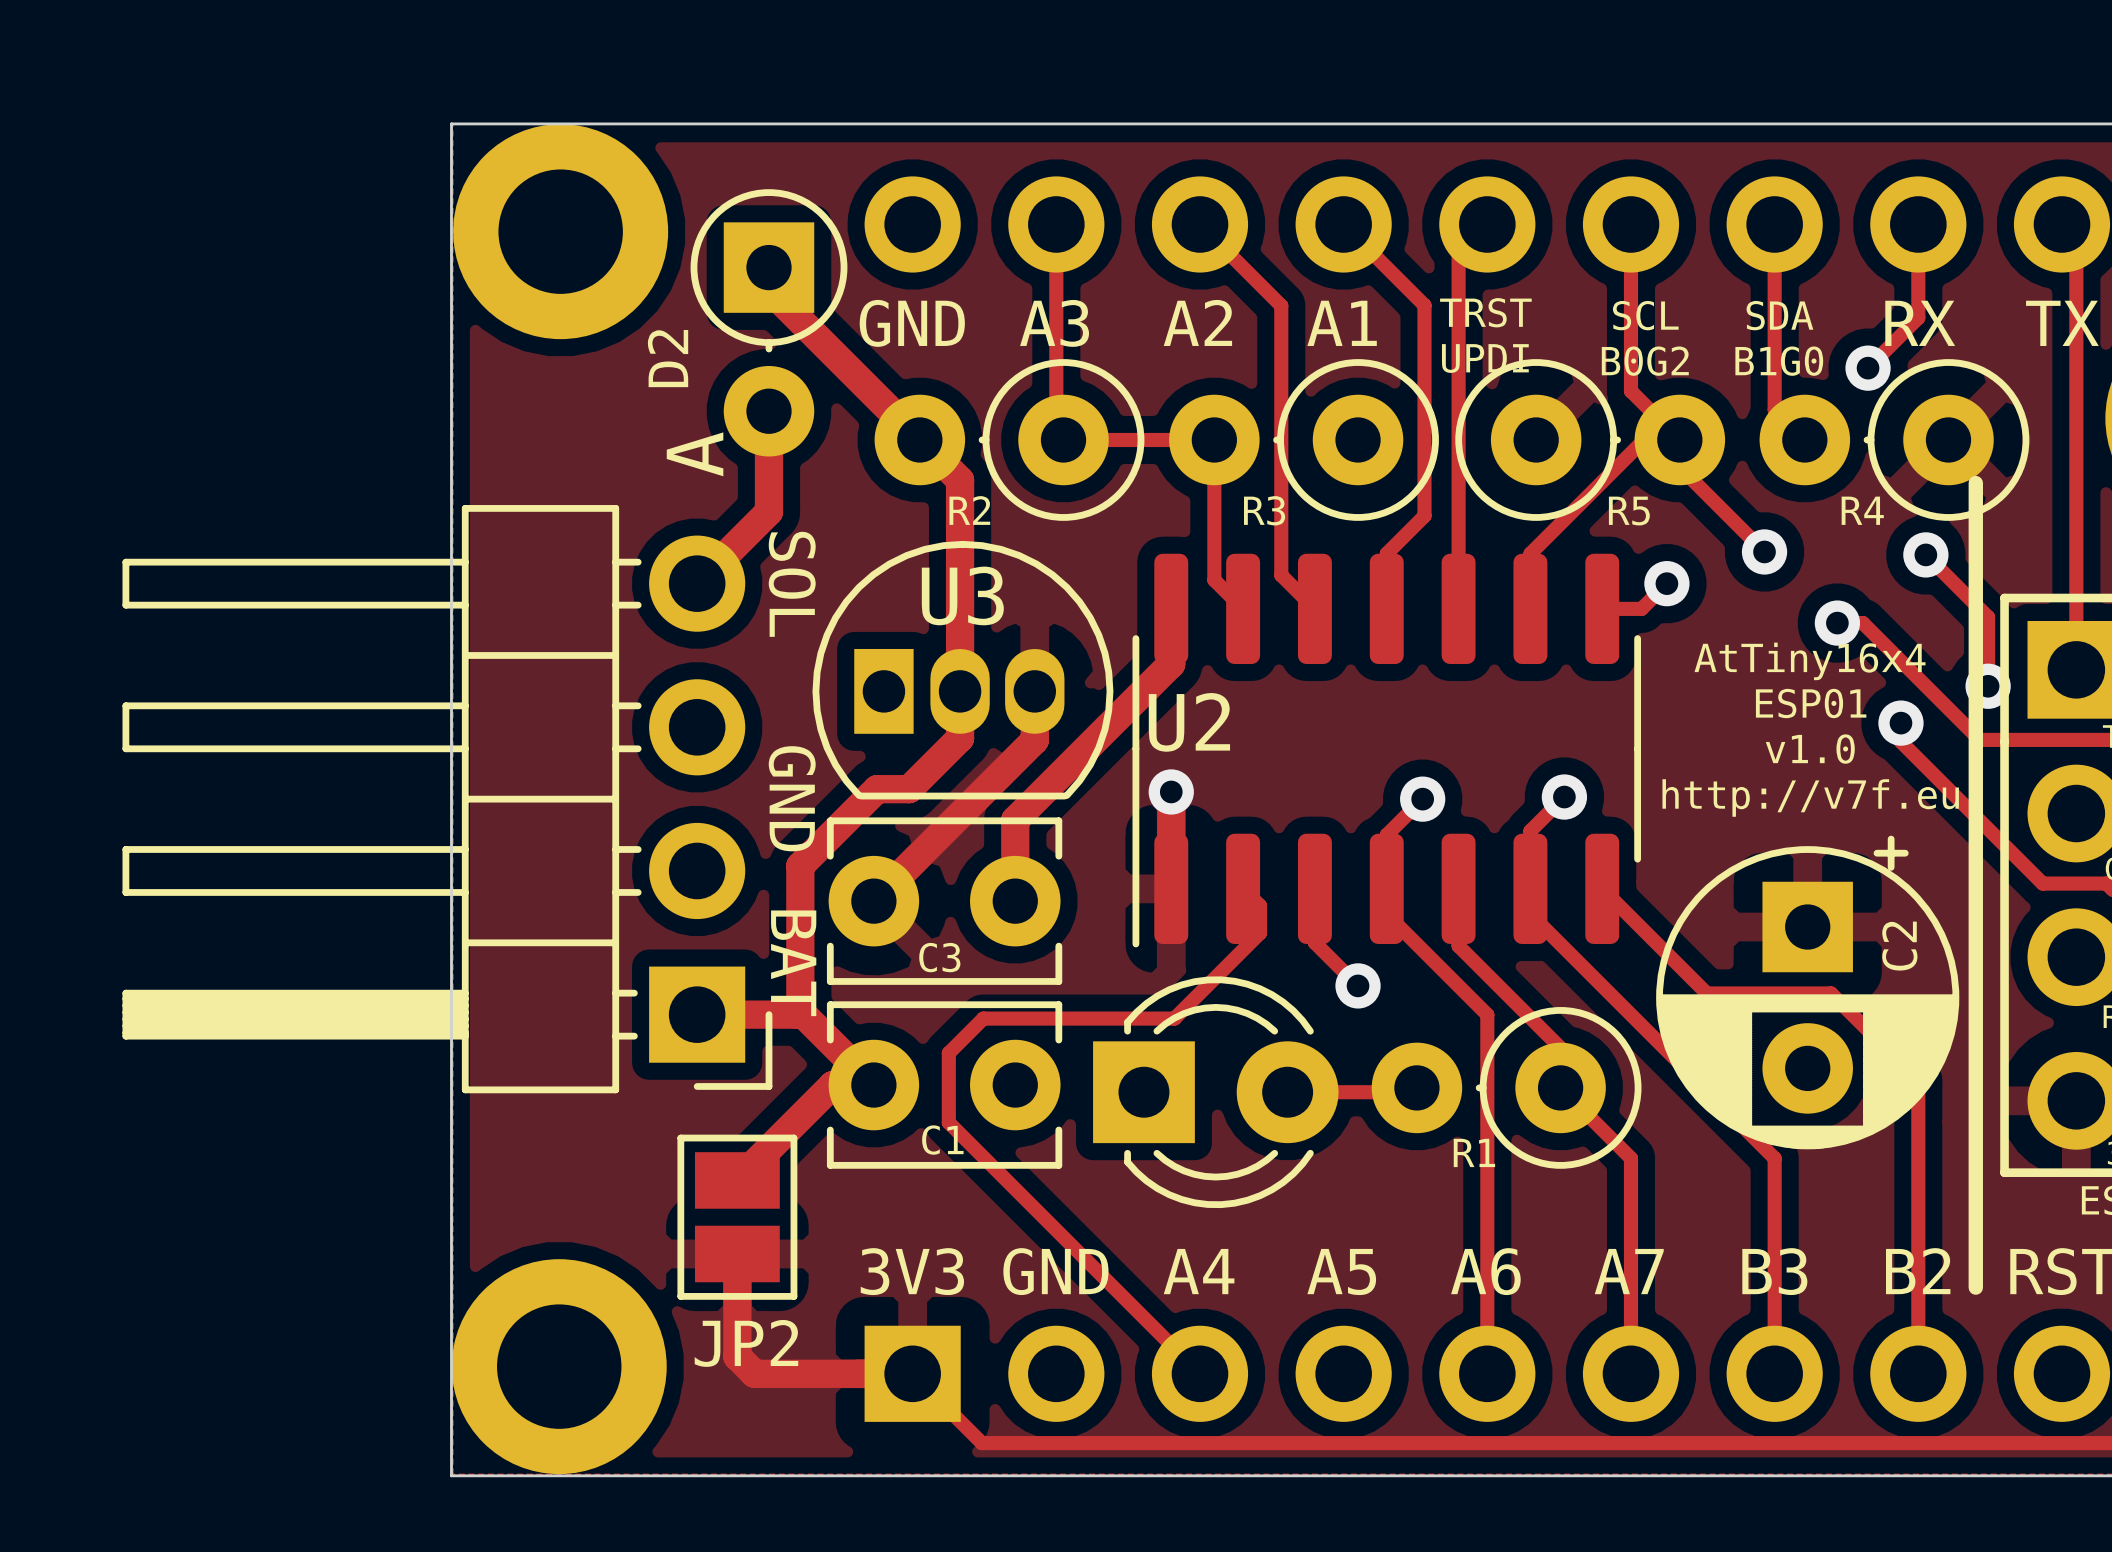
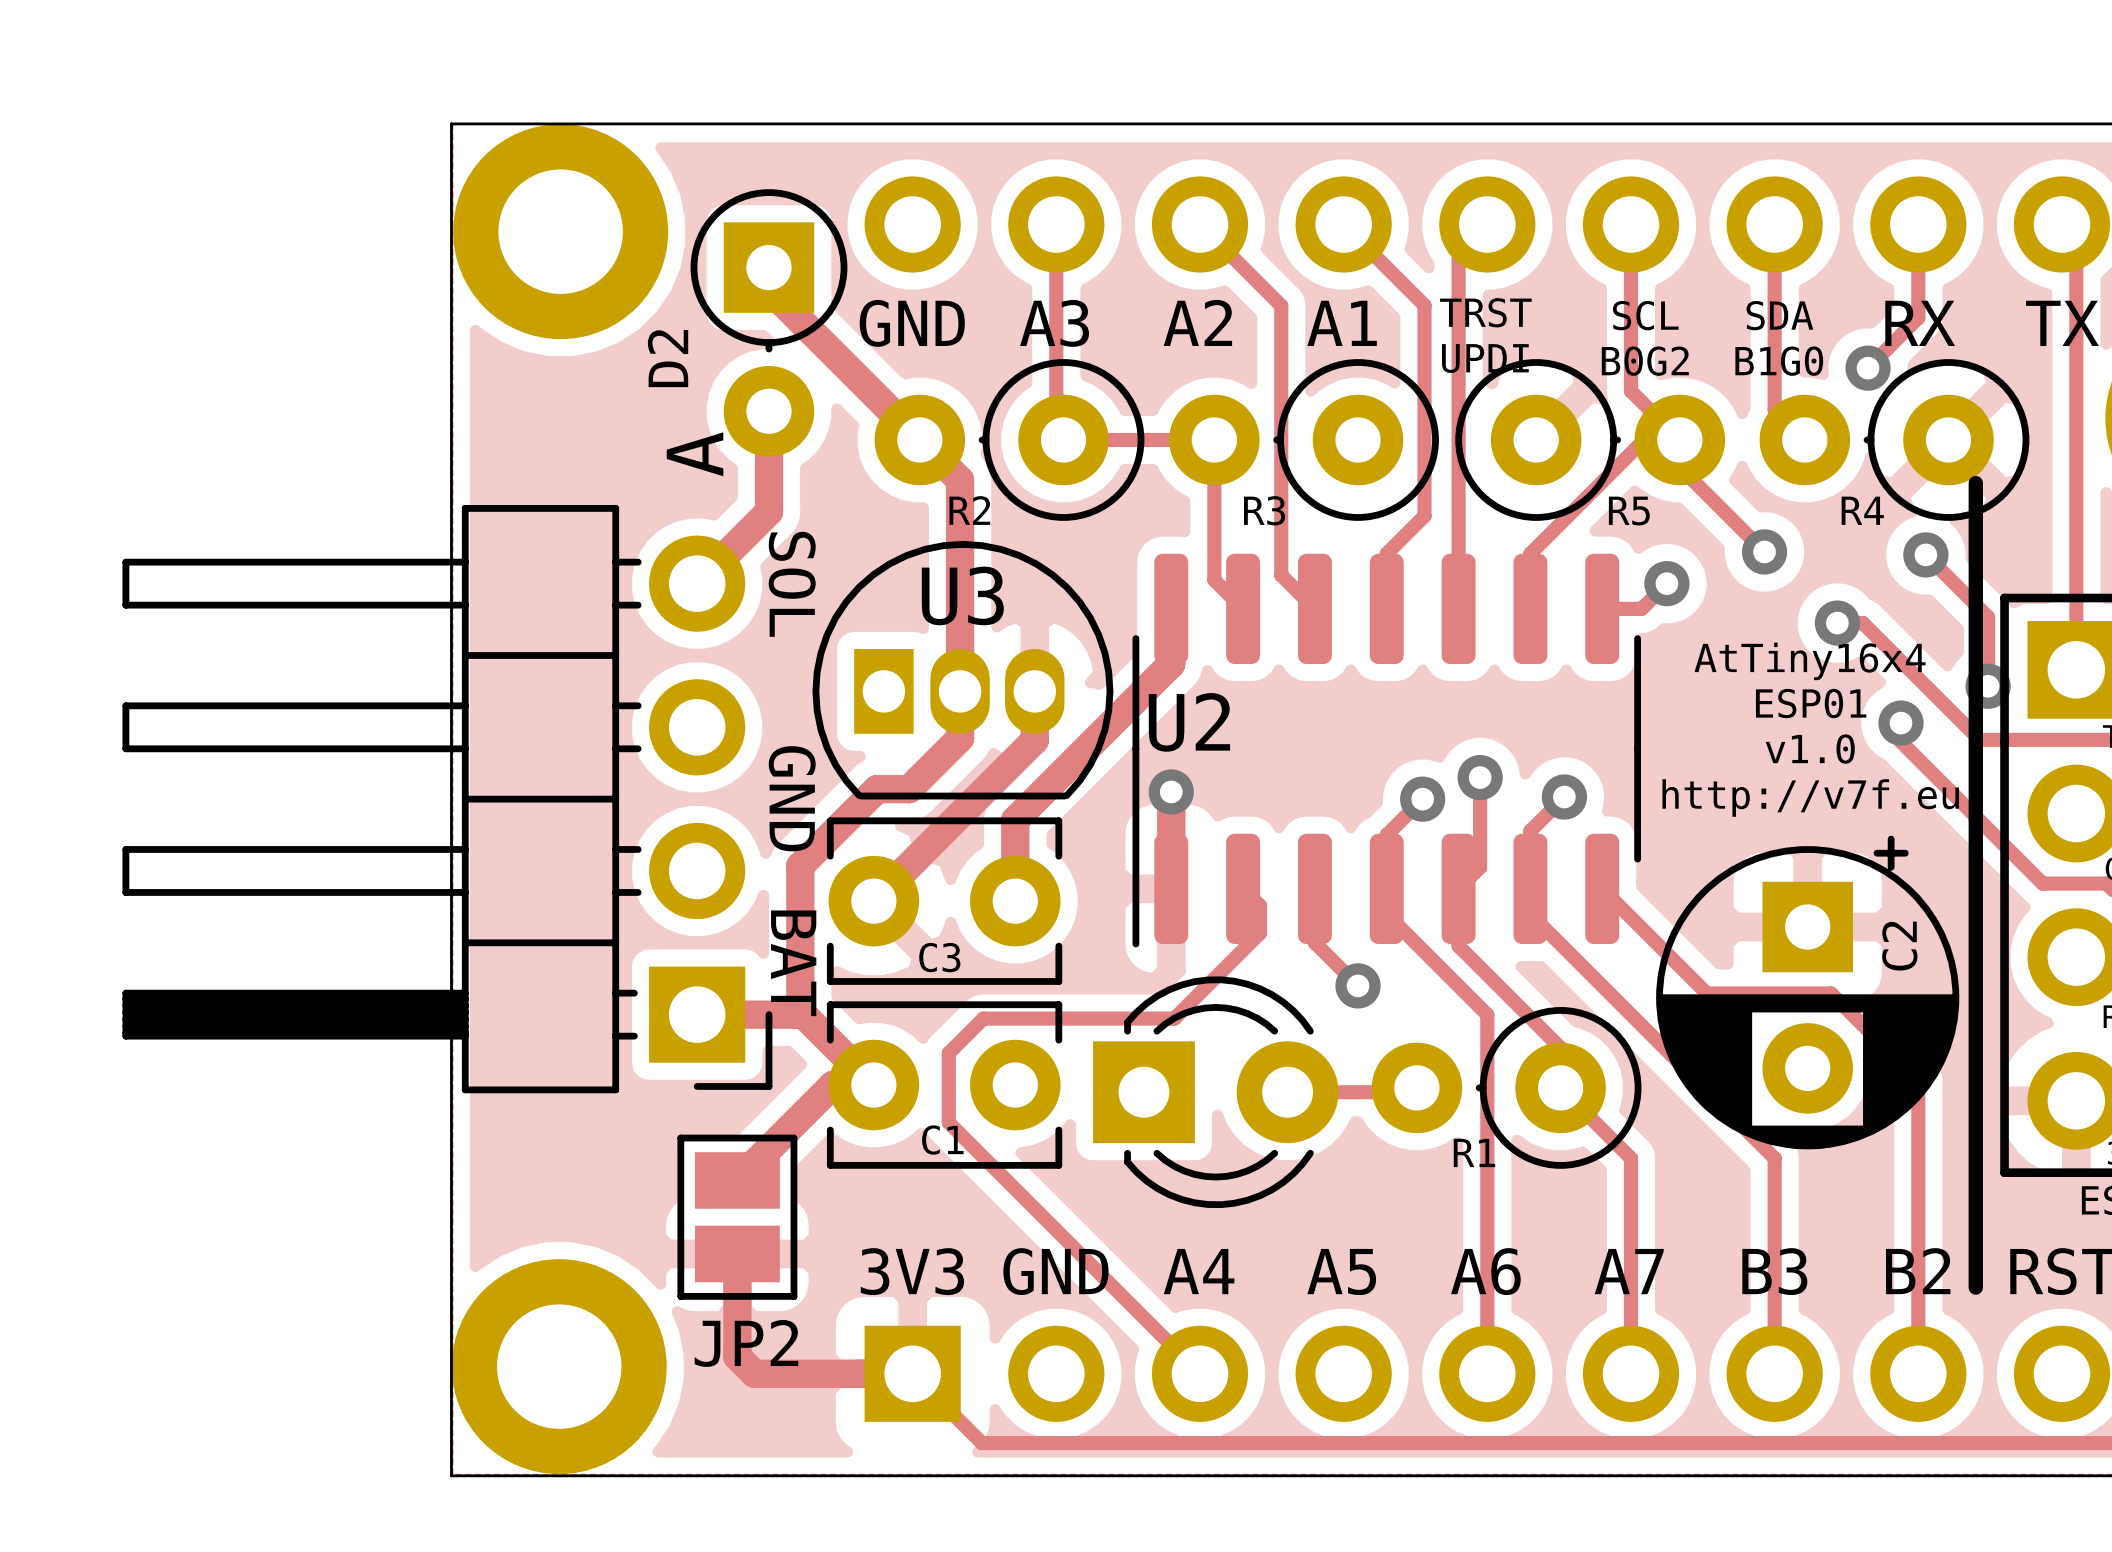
track: none -> (1480, 777) (1480, 867) (1458, 888)
via: none -> (1480, 777)

